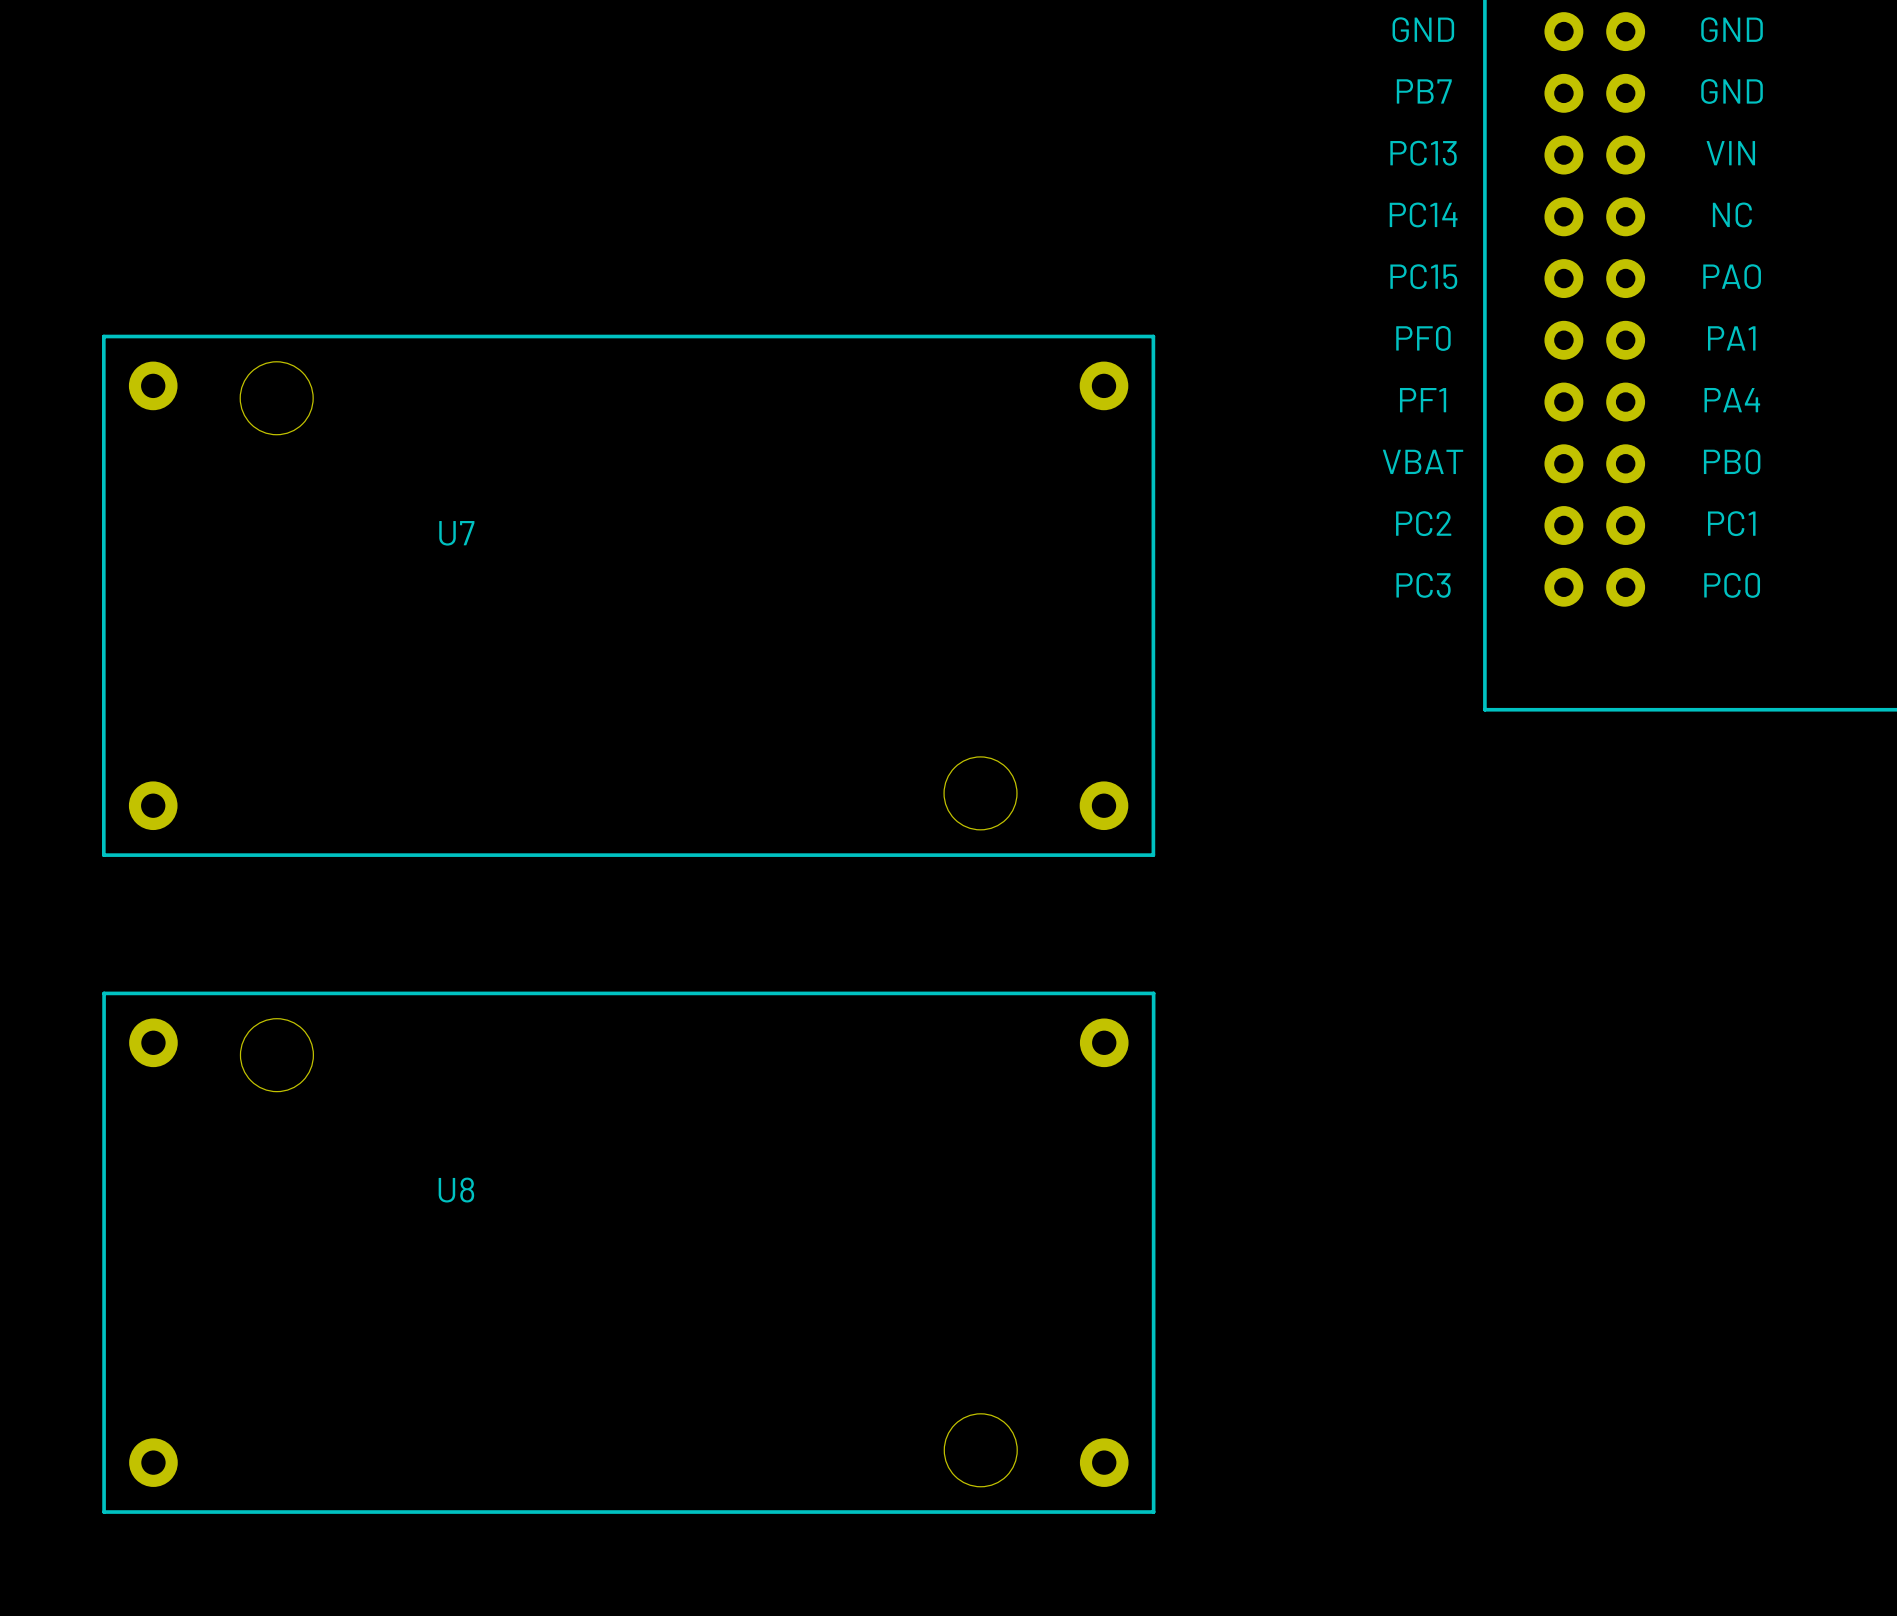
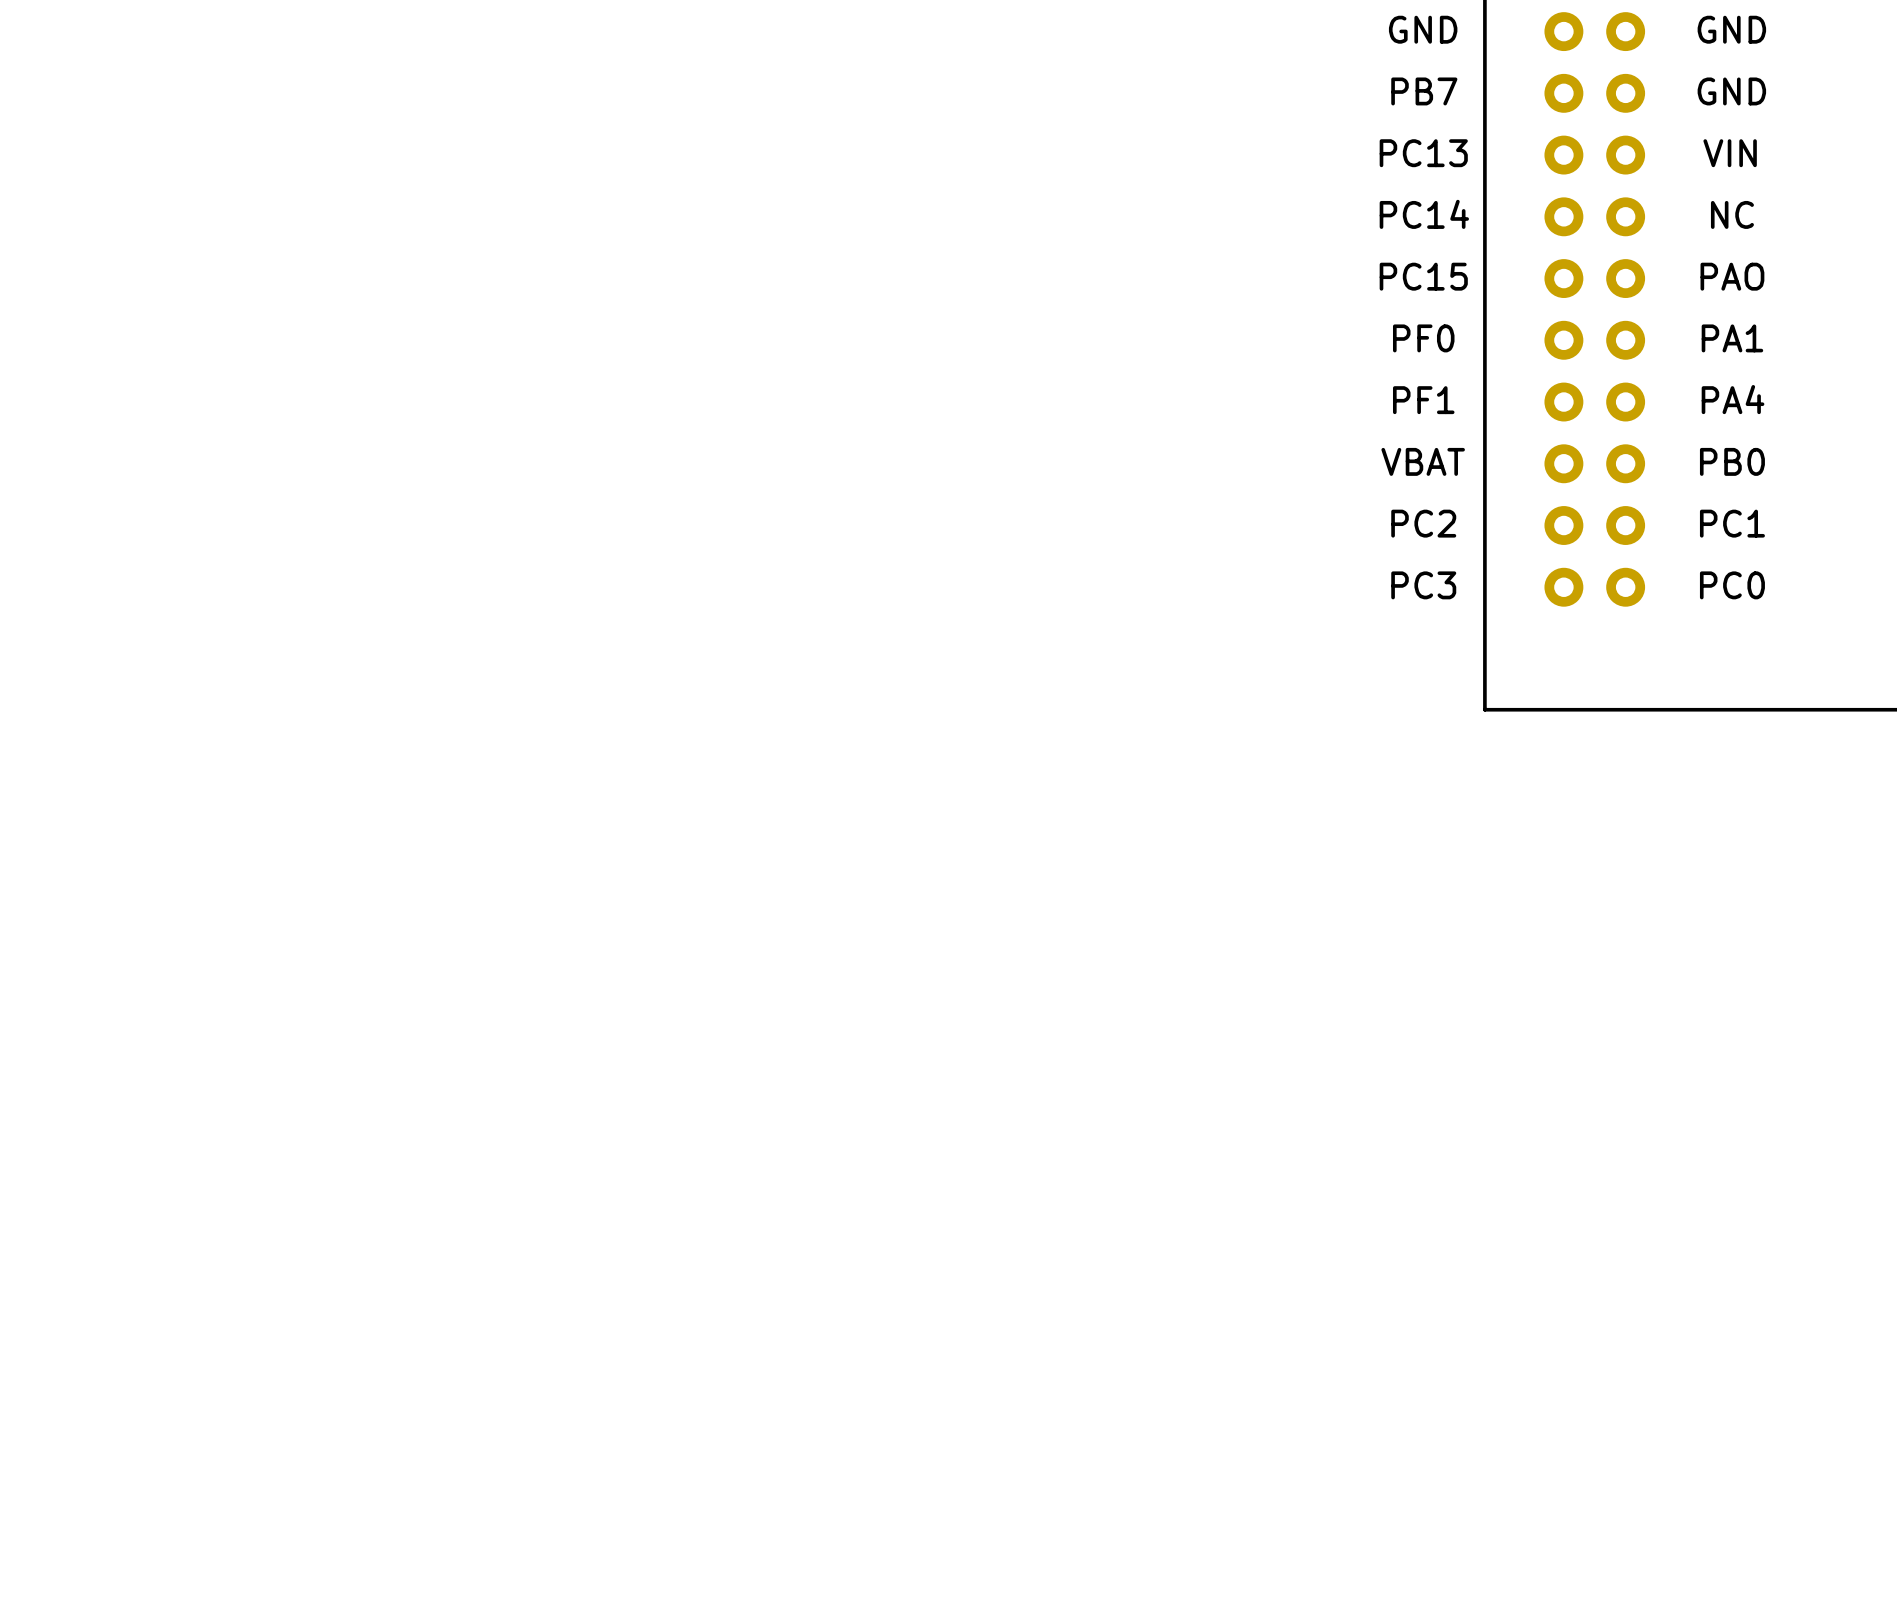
U7: (628, 595) -> none
U8: (628, 1252) -> none

